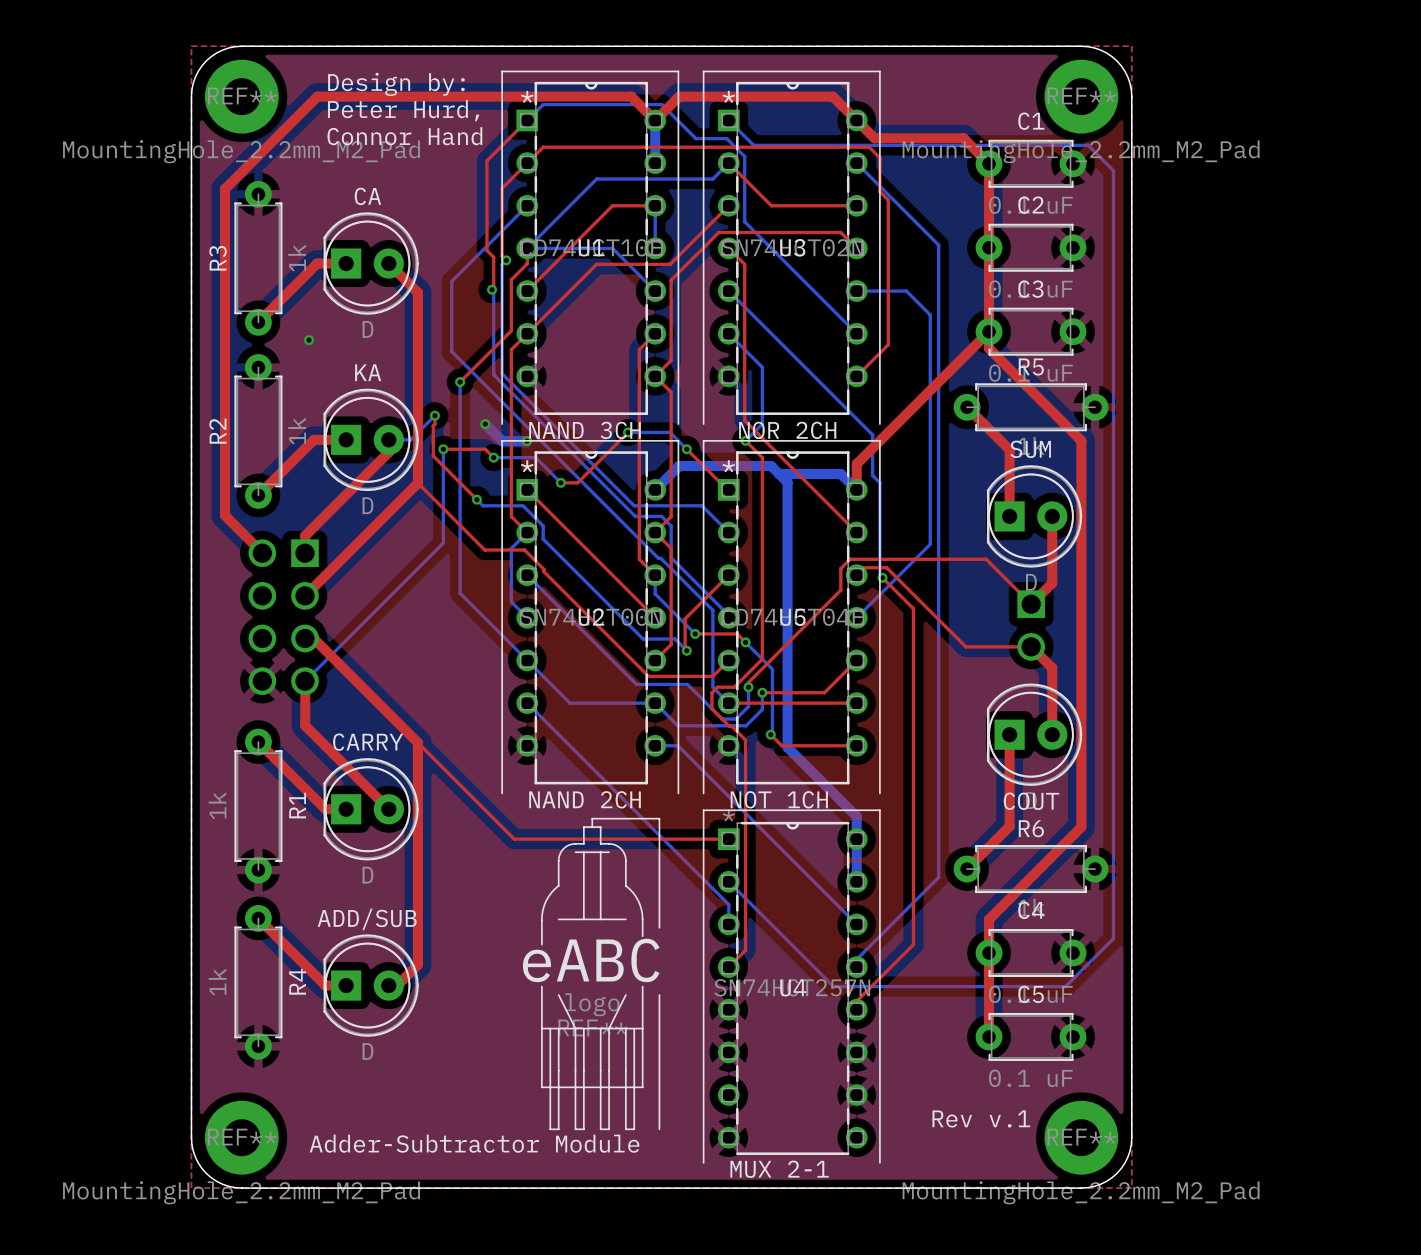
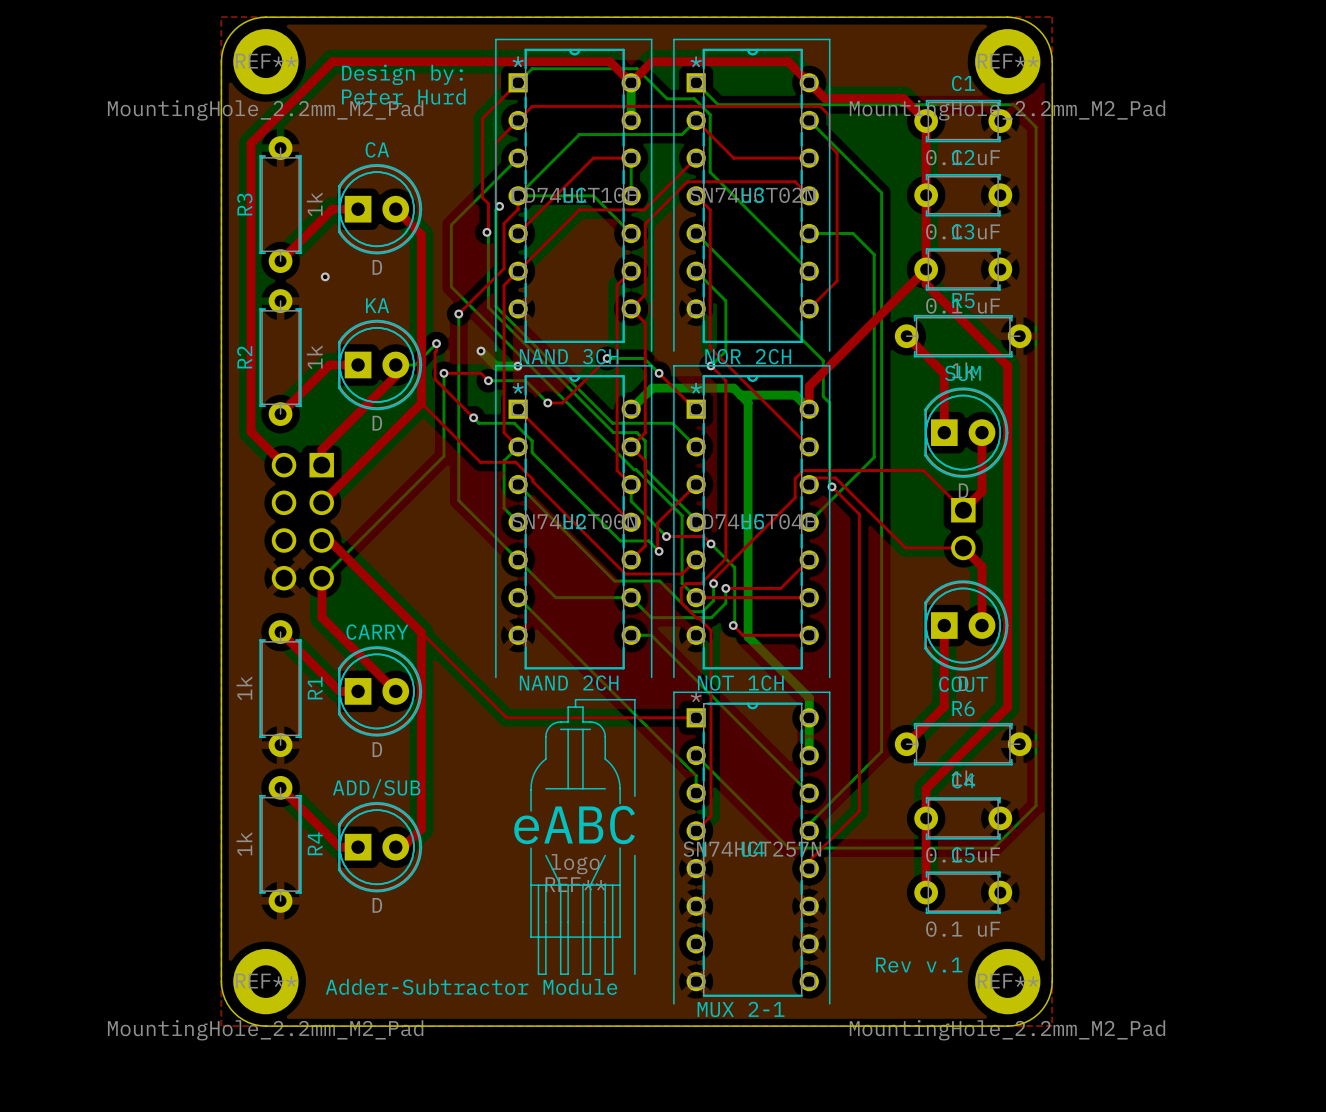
text: Design by: (396, 84) -> none
text: Peter Hurd, (403, 110) -> Design by: (402, 74)
text: Connor Hand (404, 136) -> Peter Hurd (403, 96)

